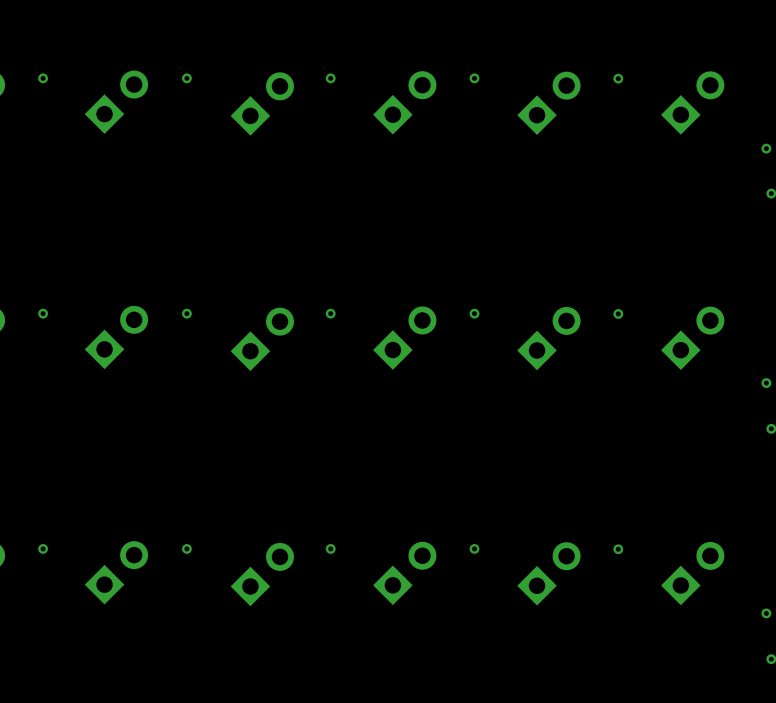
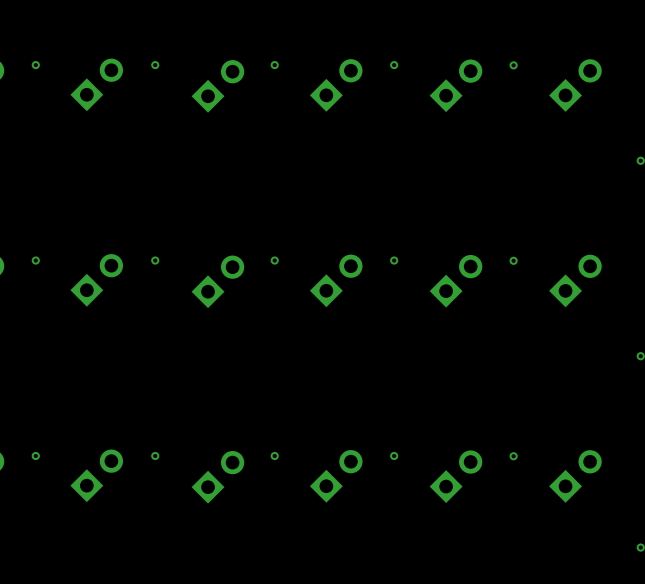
via: (766, 148) -> none
via: (766, 383) -> none
via: (766, 613) -> none

